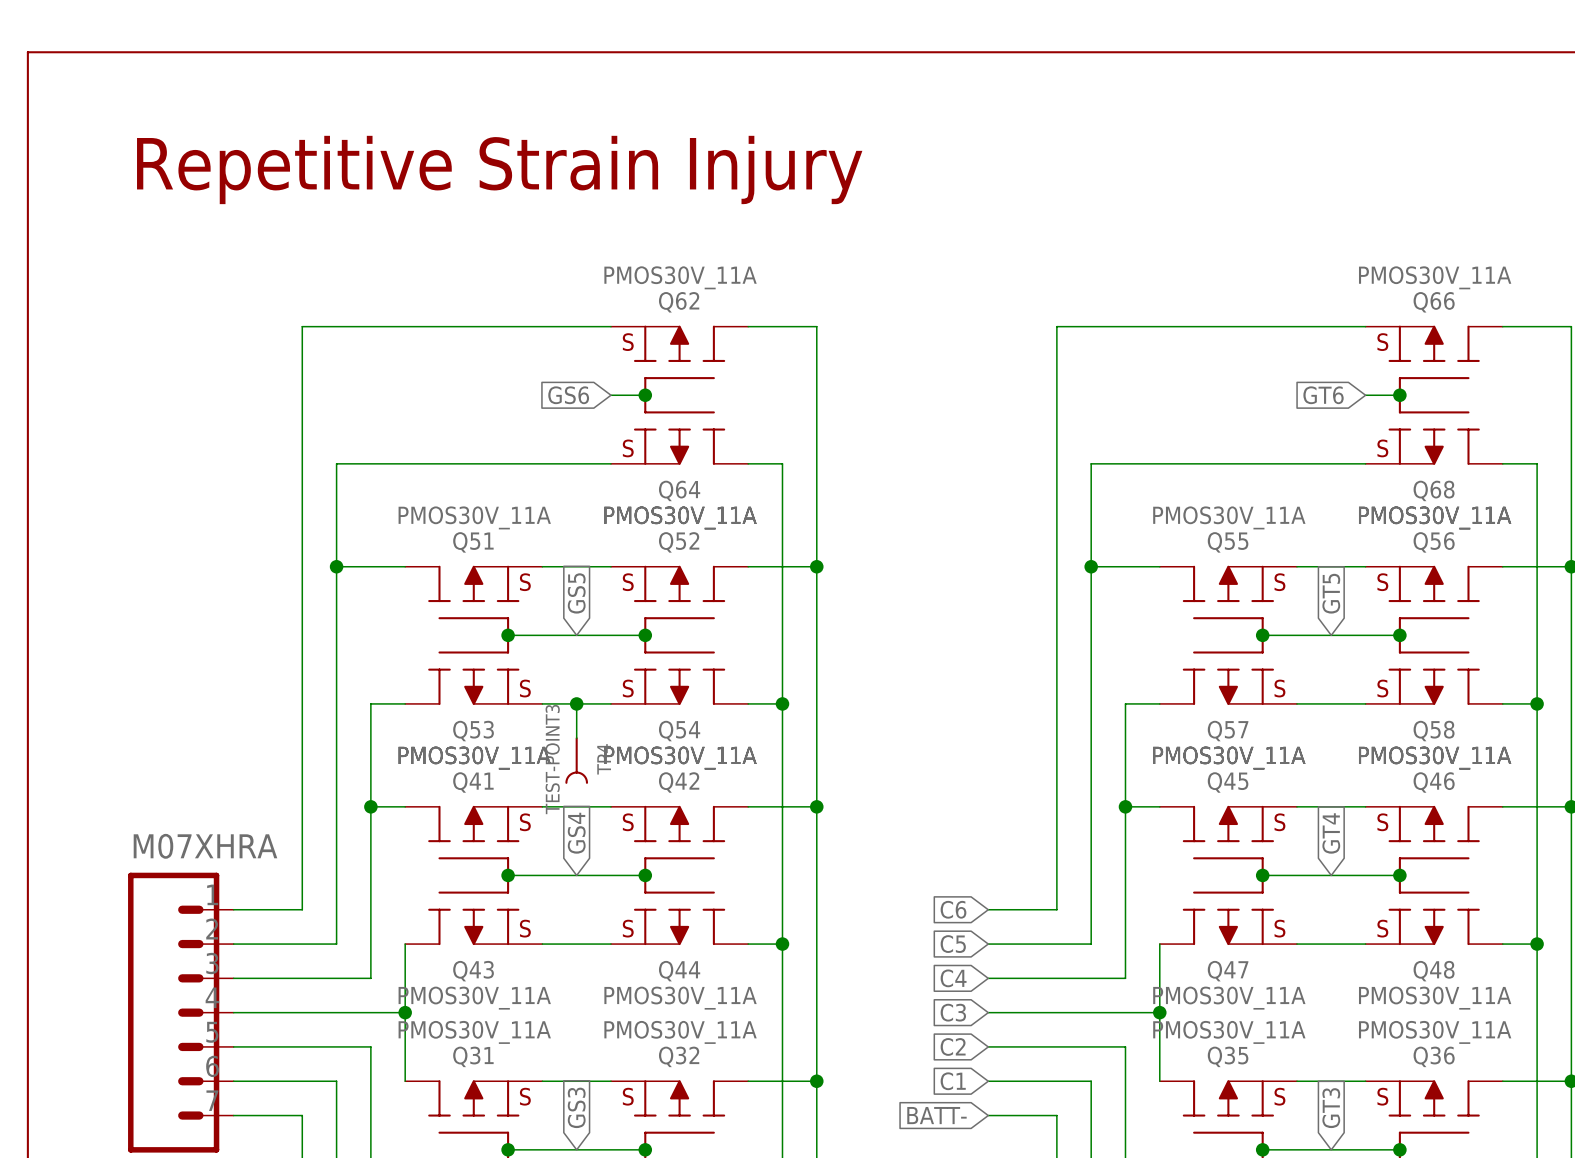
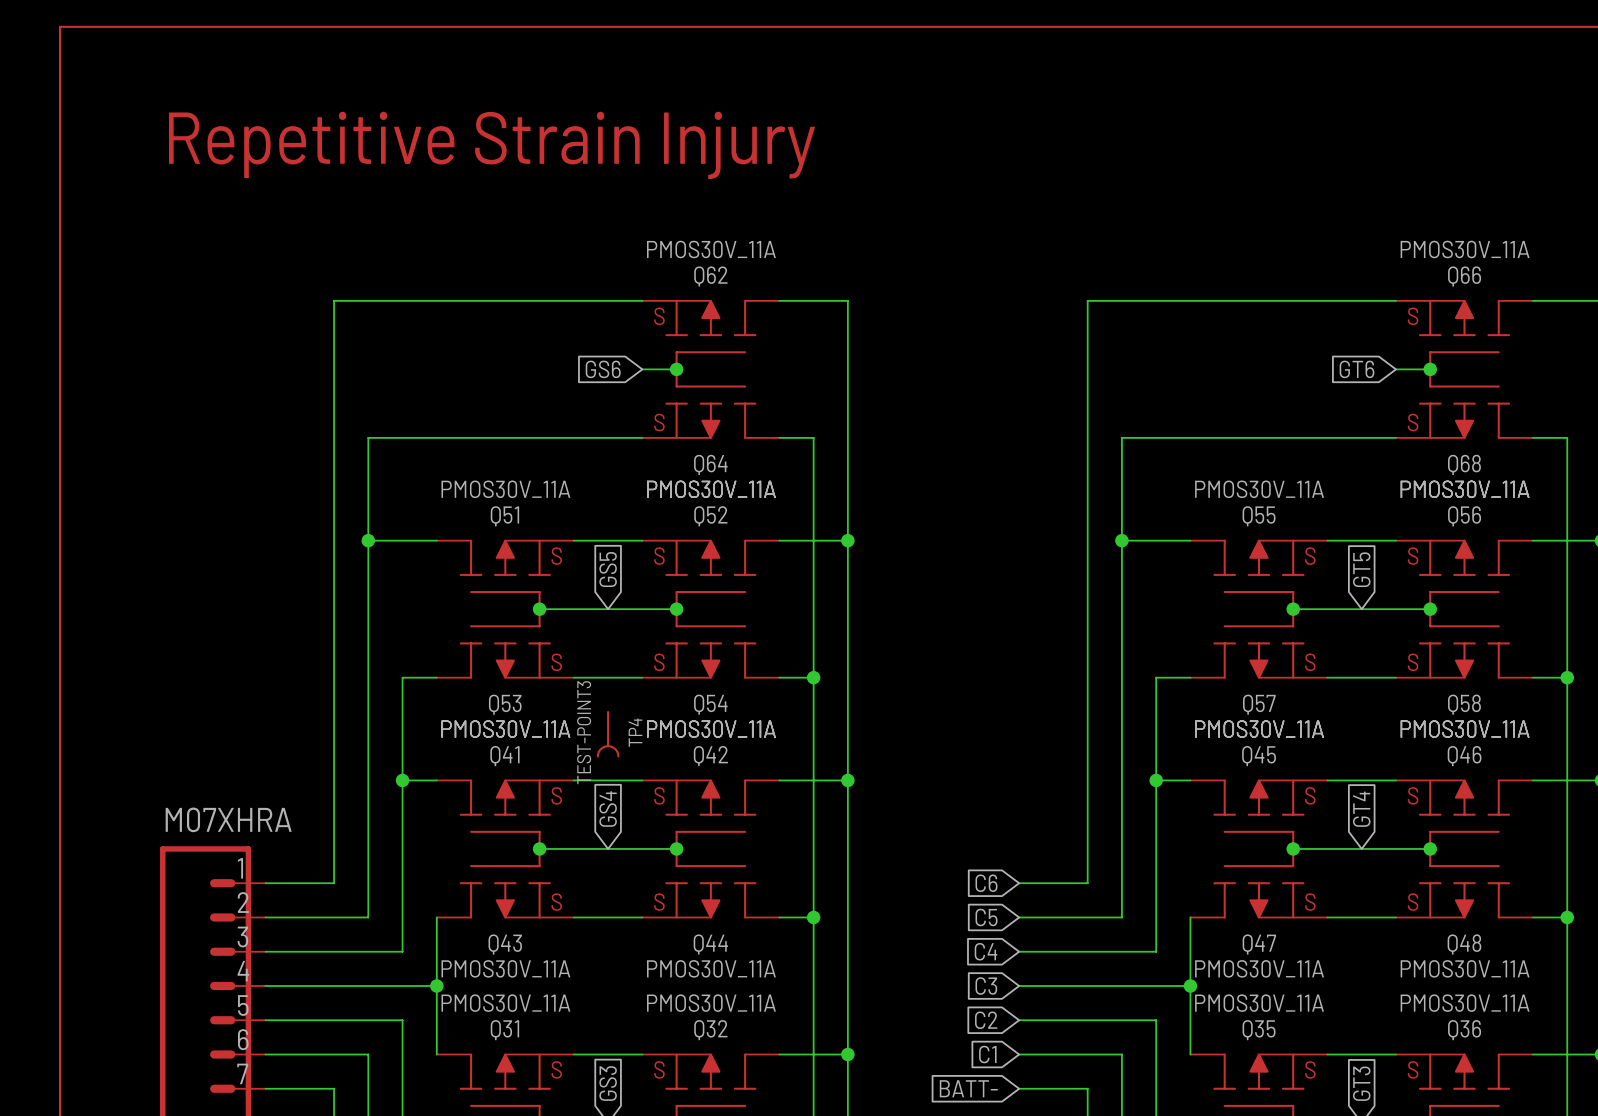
wire: (576, 703) (576, 738) -> none
junction: (576, 703) -> none

